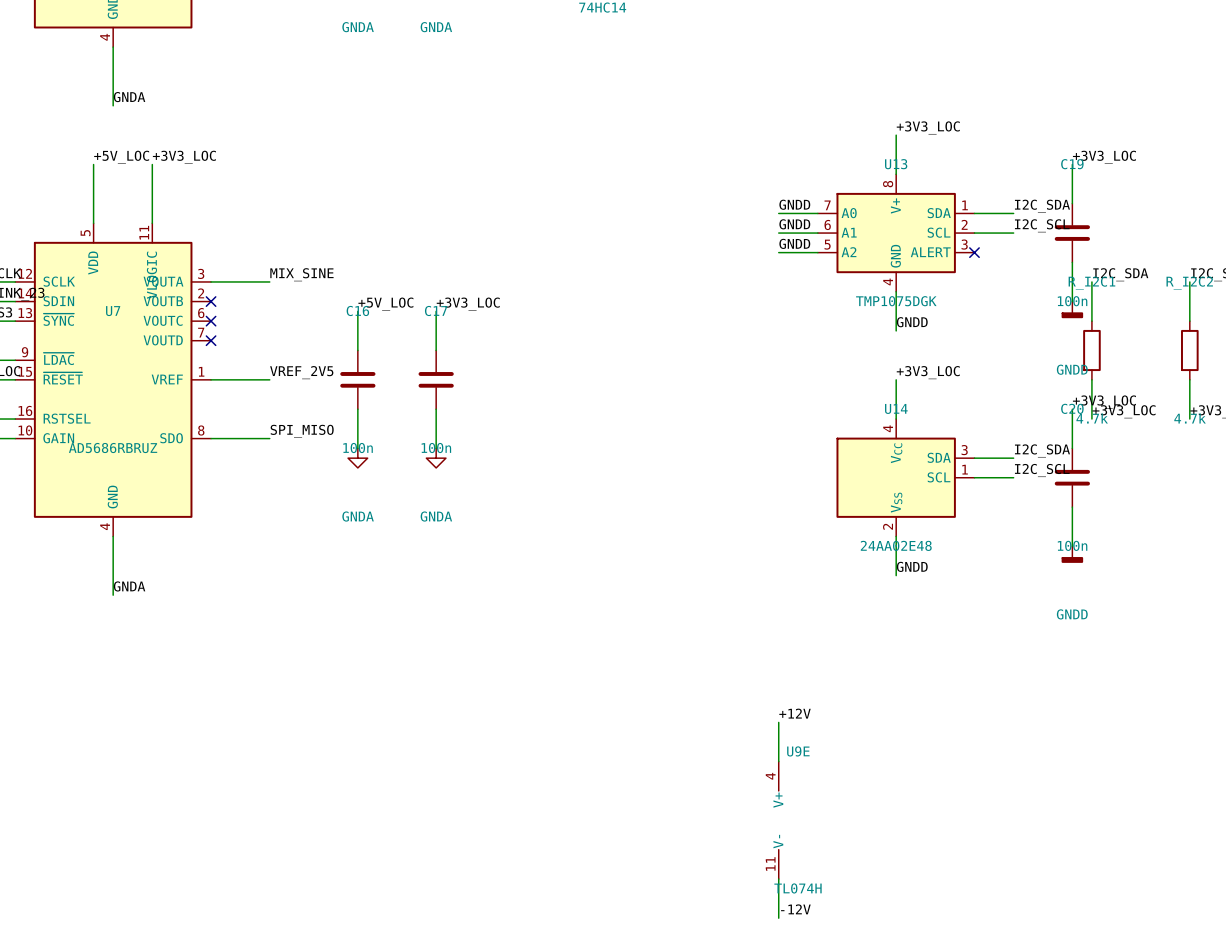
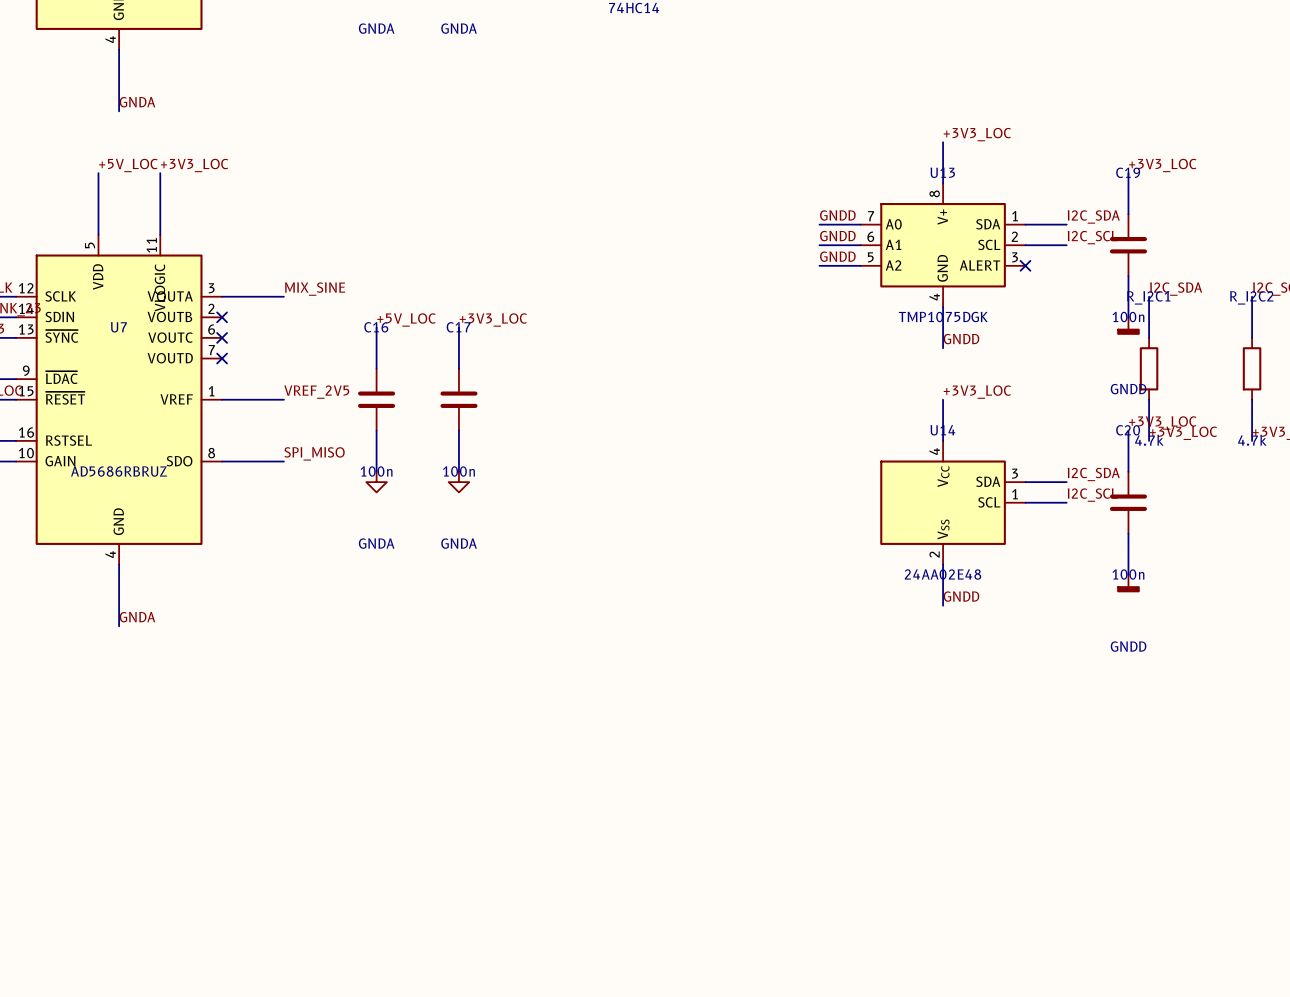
label: +12V (795, 713) -> none
wire: (778, 722) (778, 761) -> none
U9E: TL074H (778, 820) -> none
wire: (778, 879) (778, 918) -> none
label: -12V (795, 909) -> none

